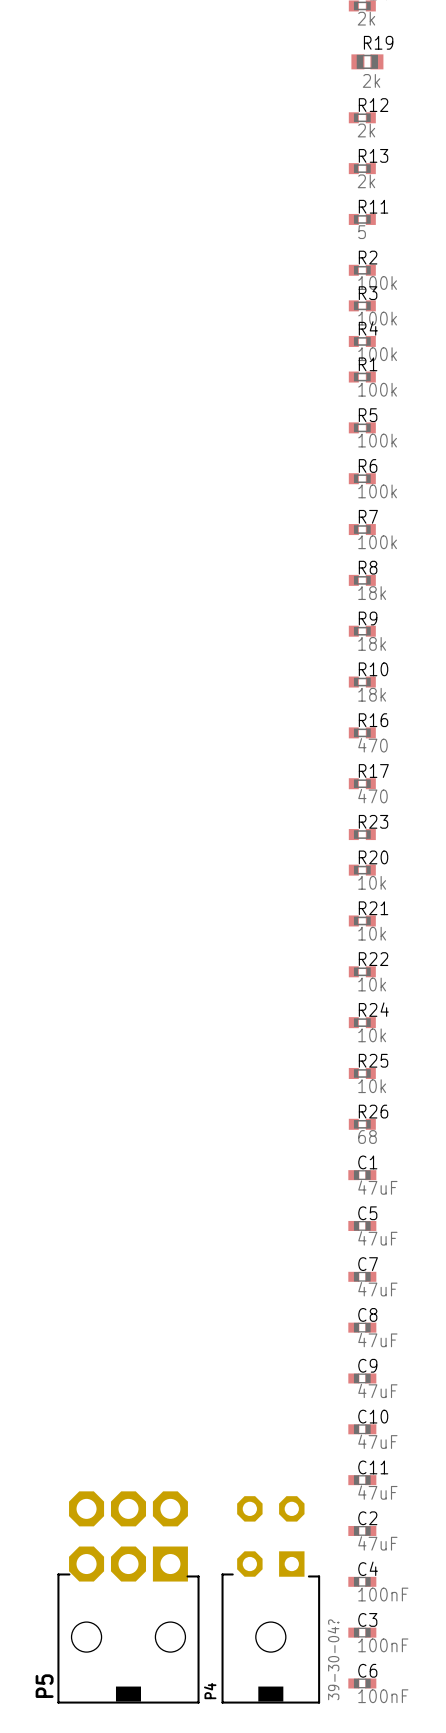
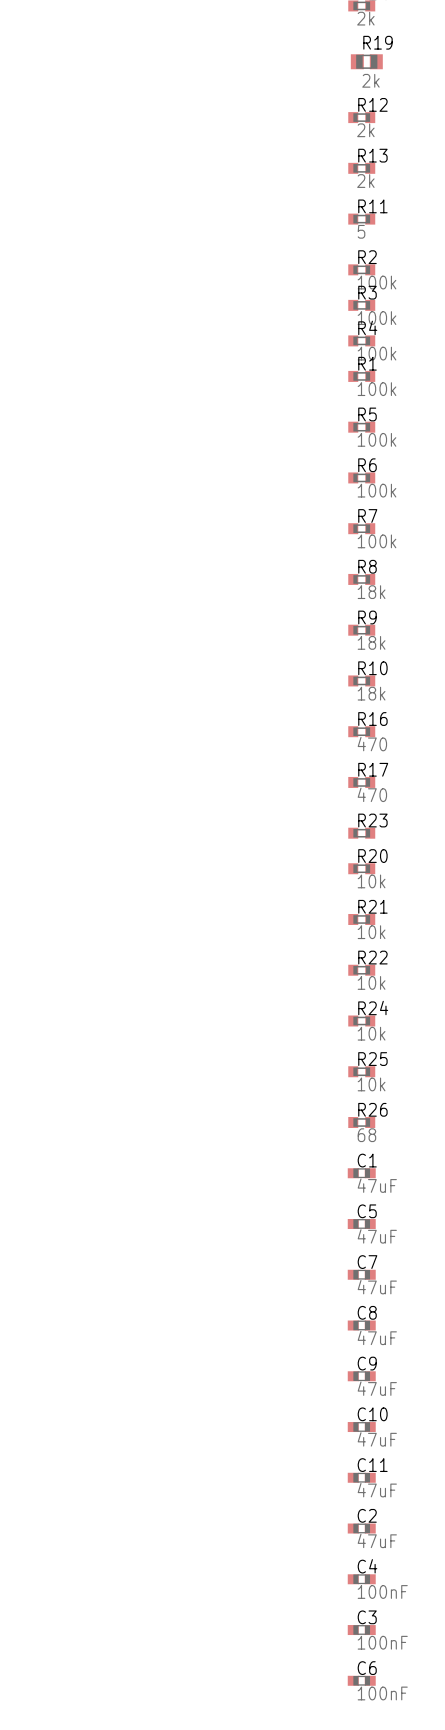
P5: (128, 1597) -> none
P4: 39-30-04? (270, 1599) -> none

